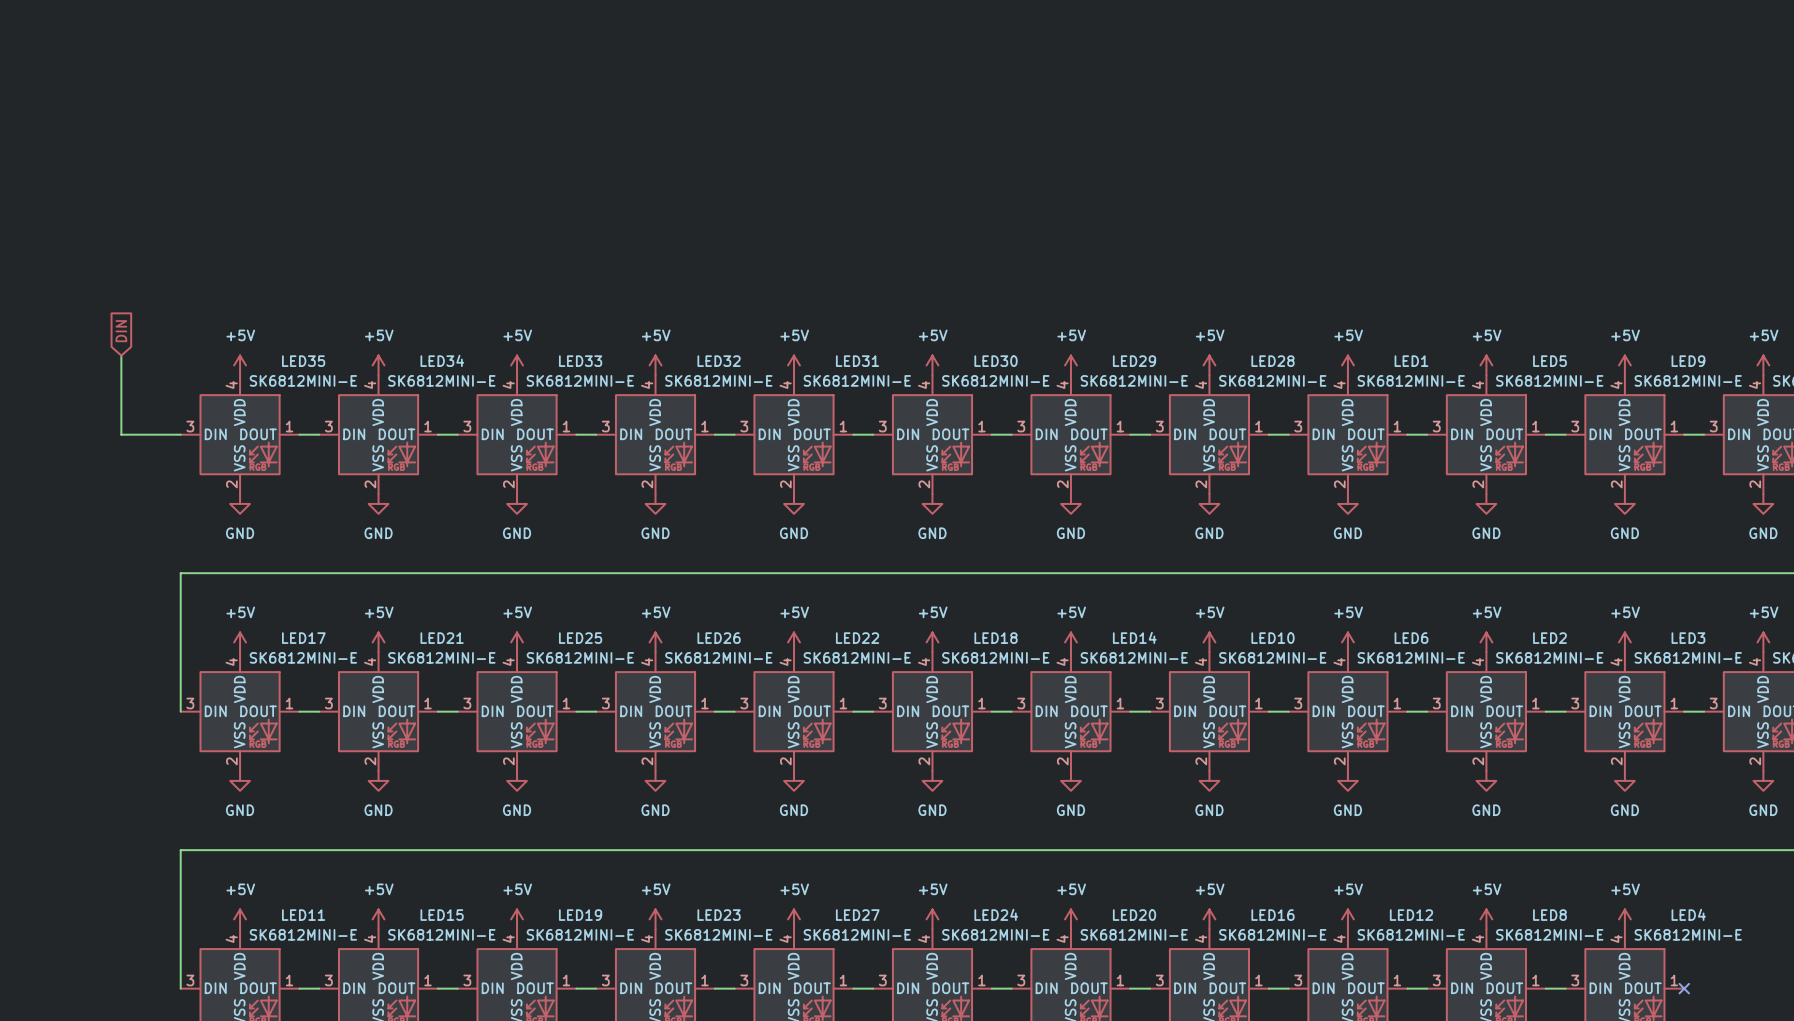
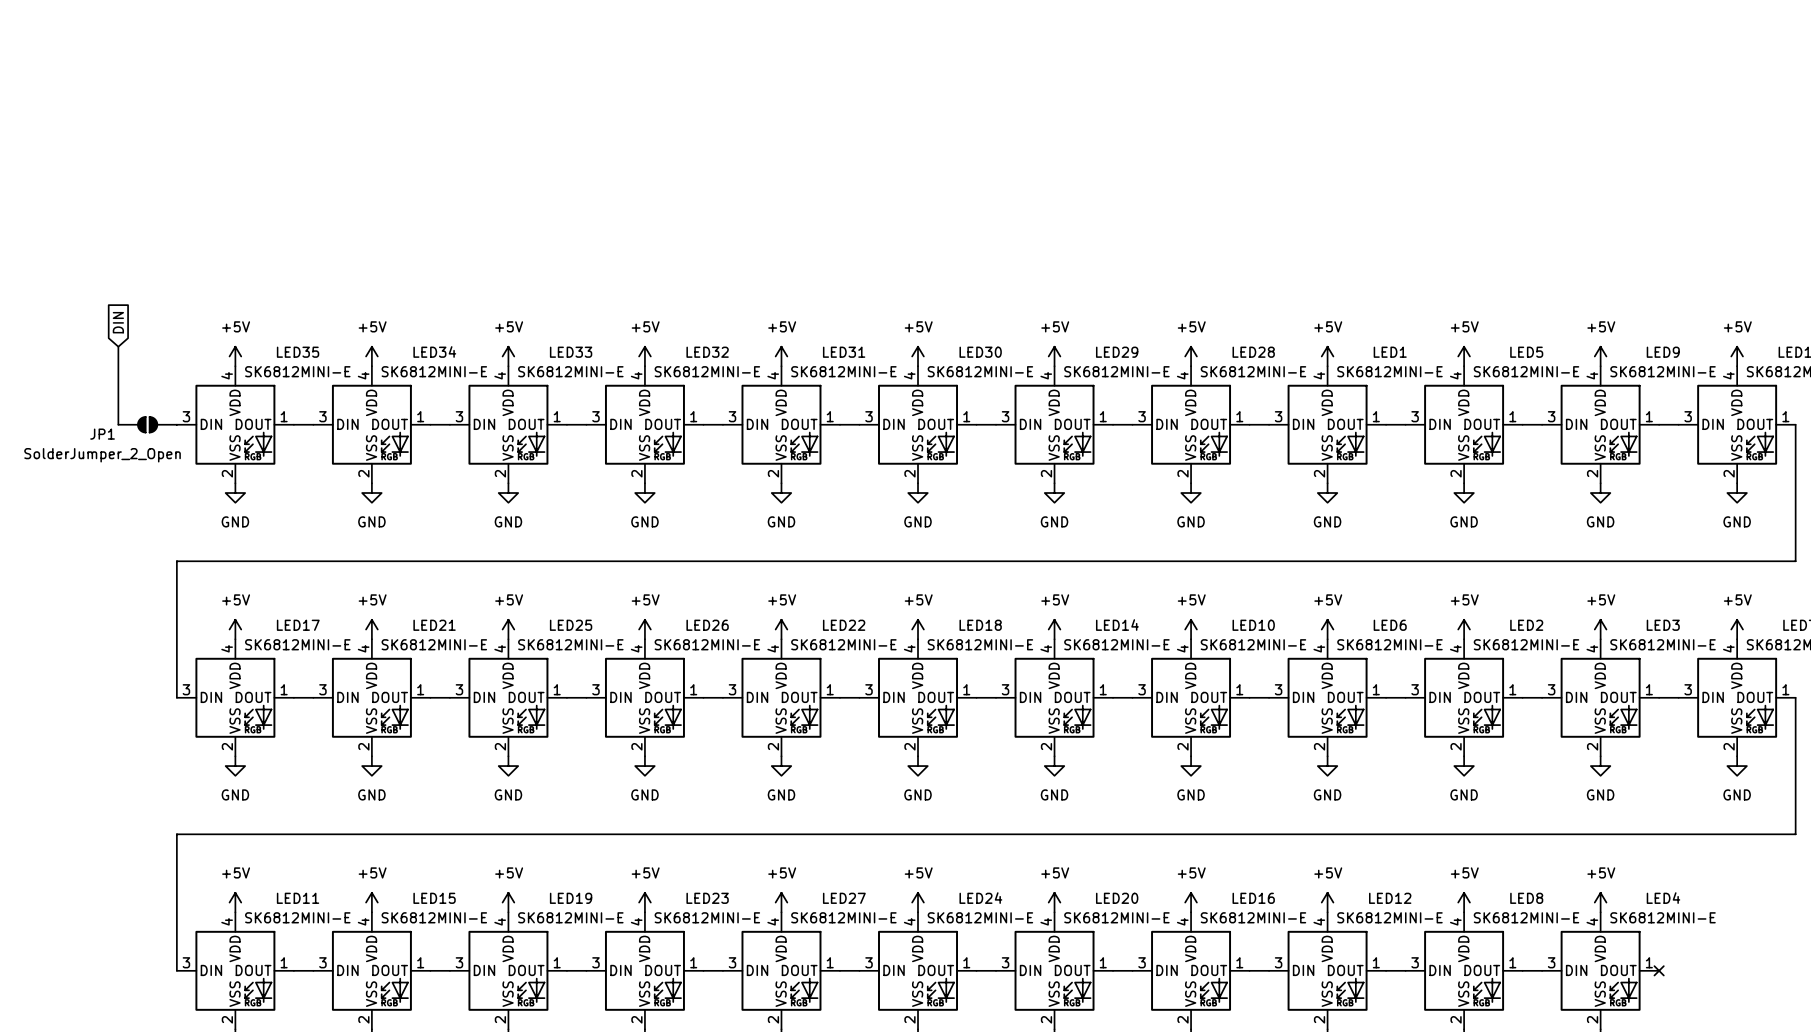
JP1: none -> SolderJumper_2_Open (147, 424)

